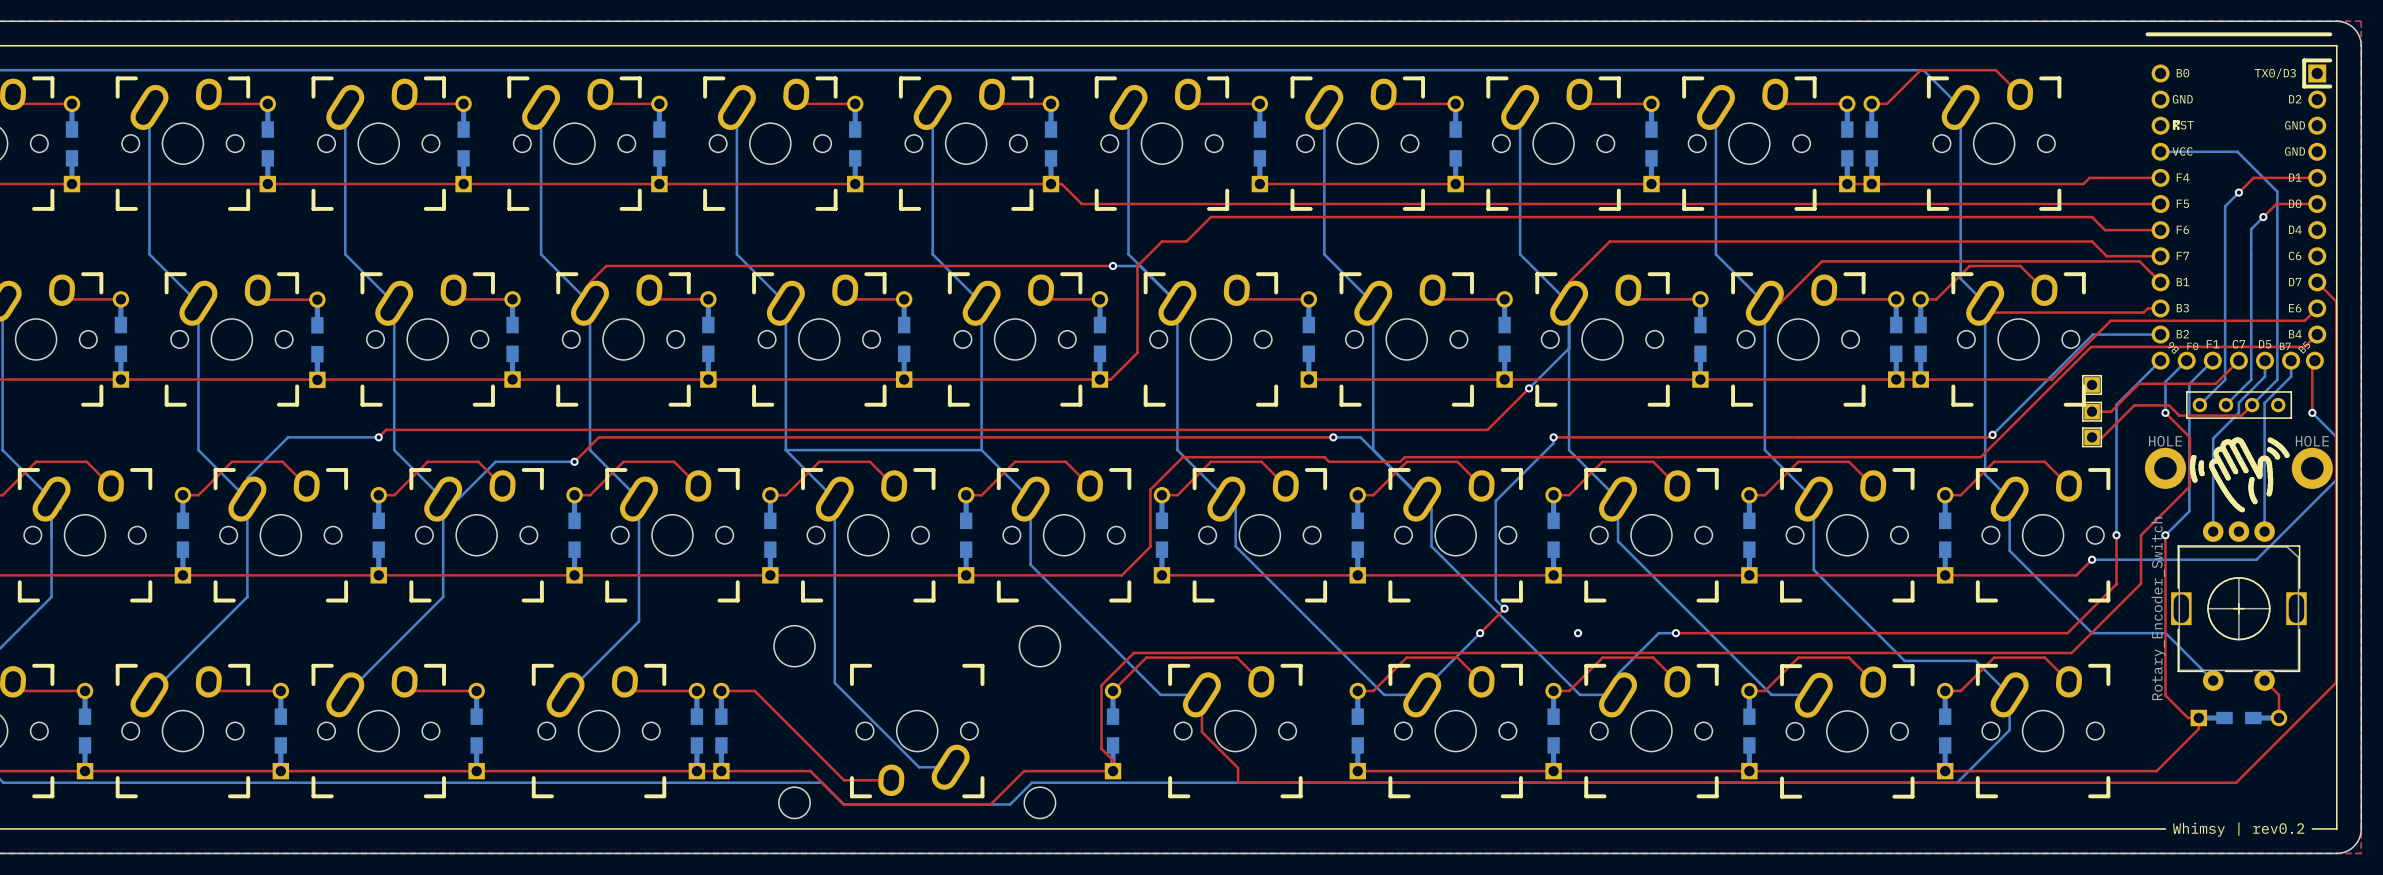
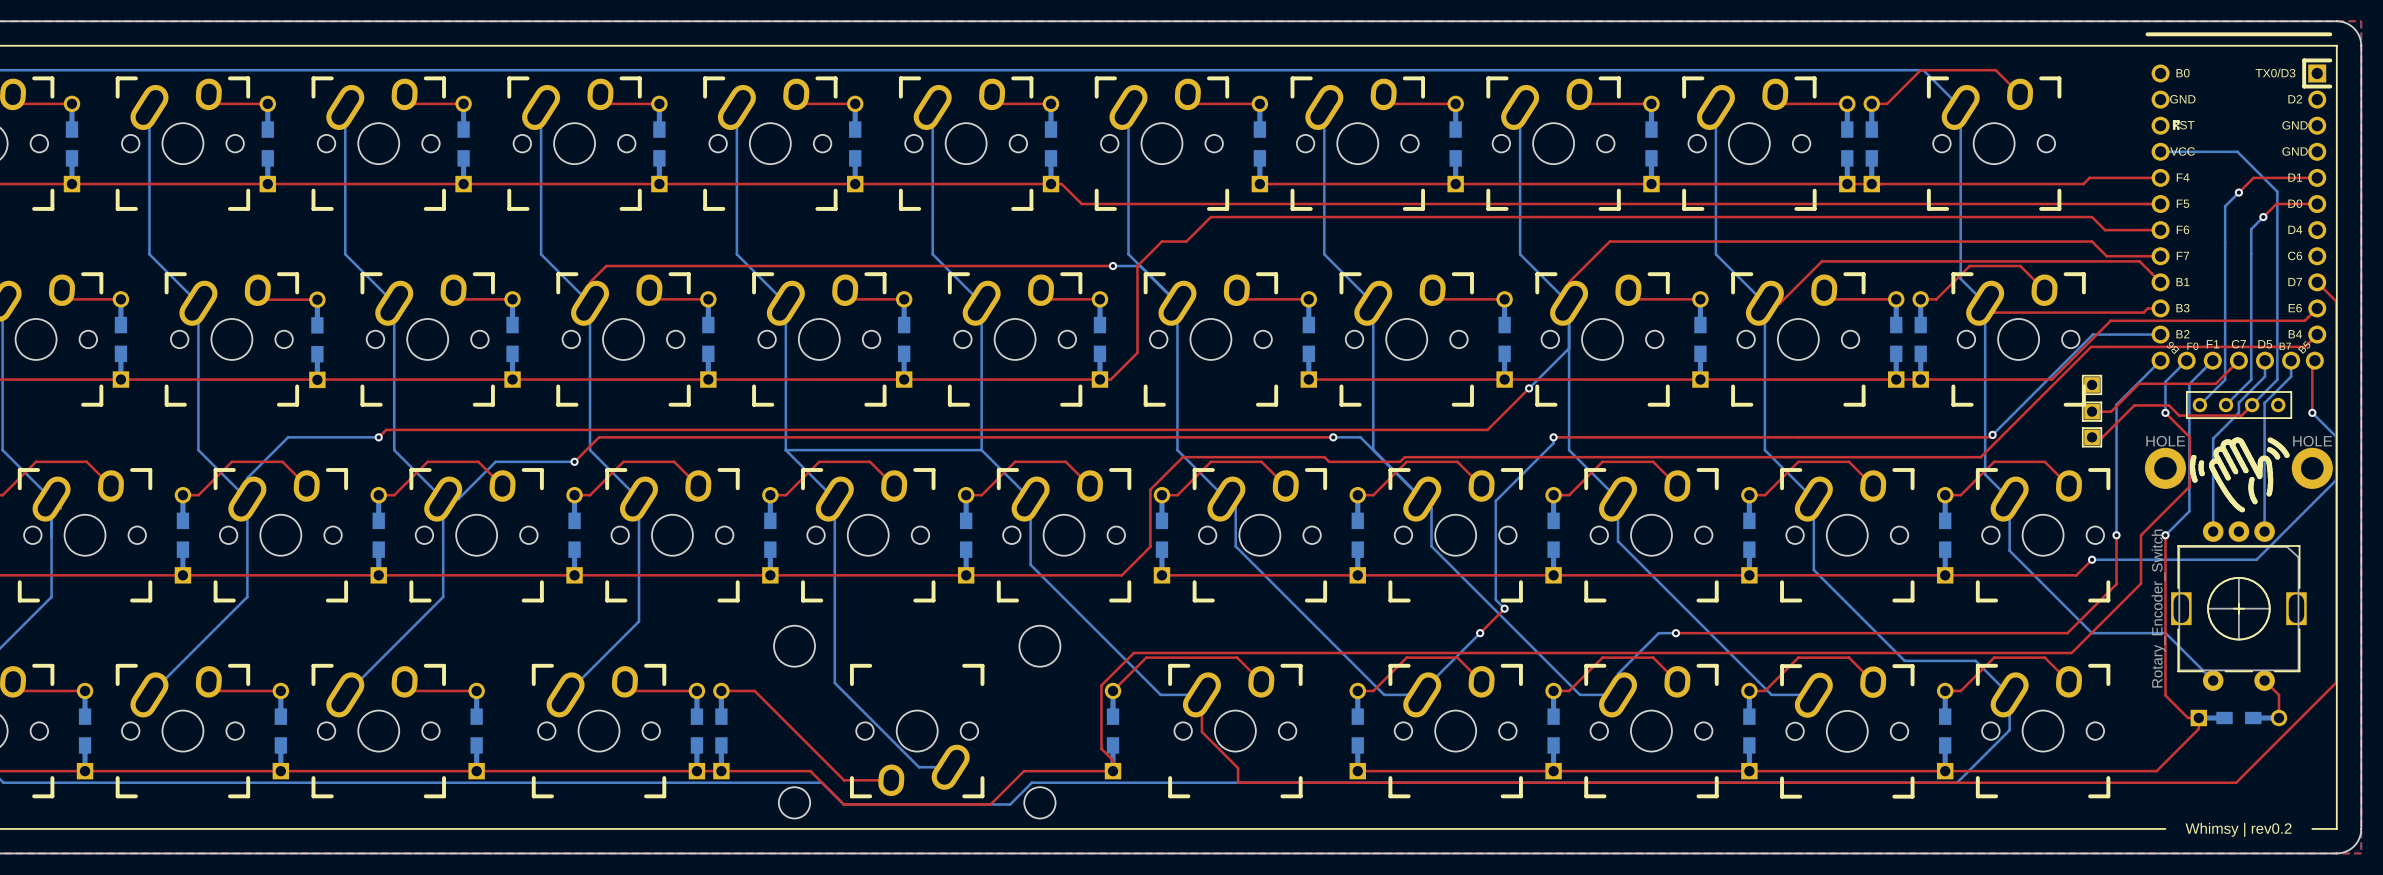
via: (1578, 633) -> none

